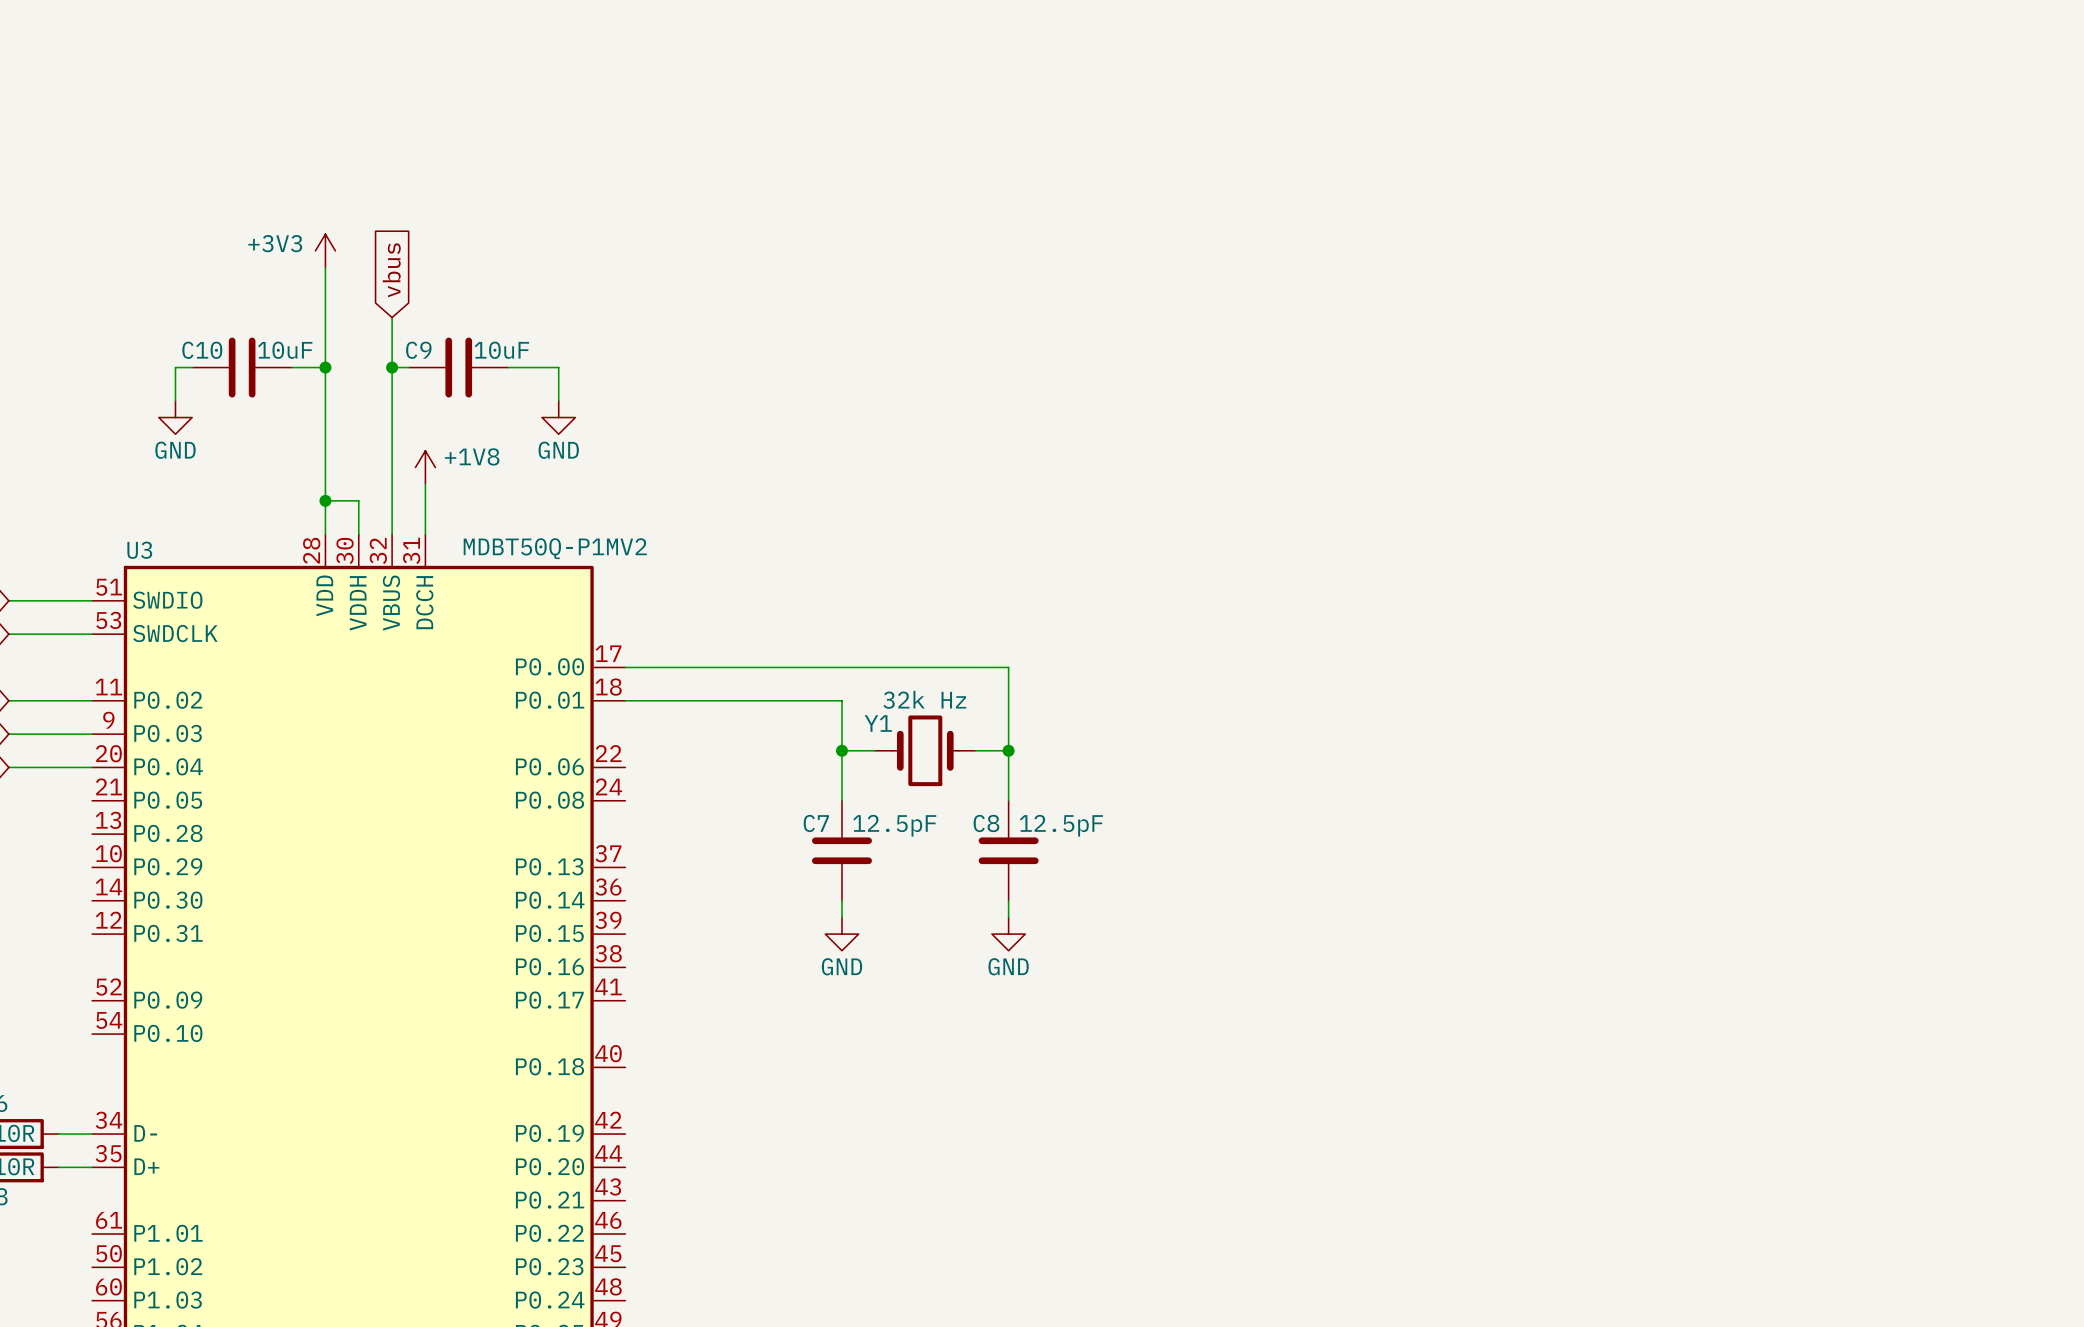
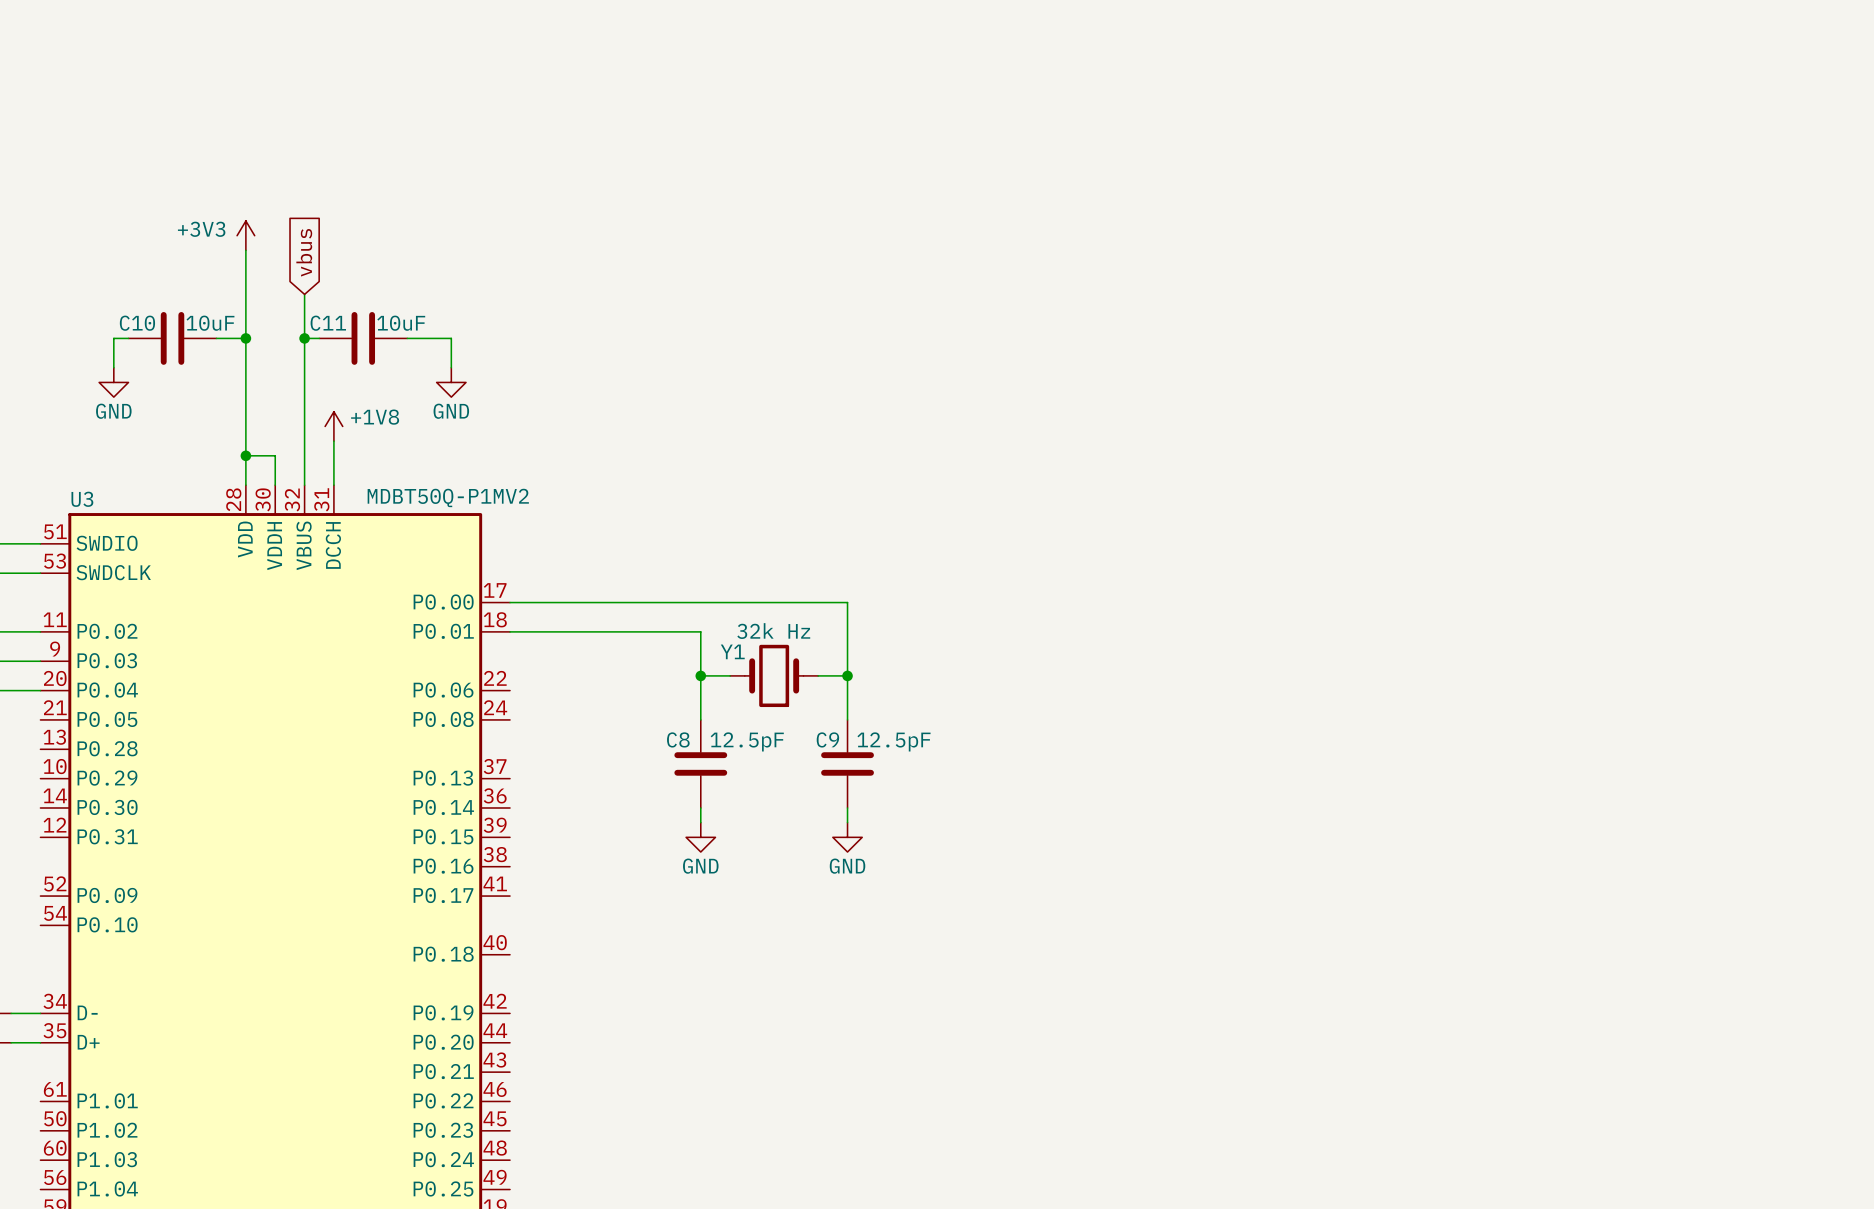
C9 name: C9 (418, 350) -> C11 (328, 323)
C7 name: C7 (816, 823) -> C8 (678, 739)
C8 name: C8 (986, 823) -> C9 (827, 739)

